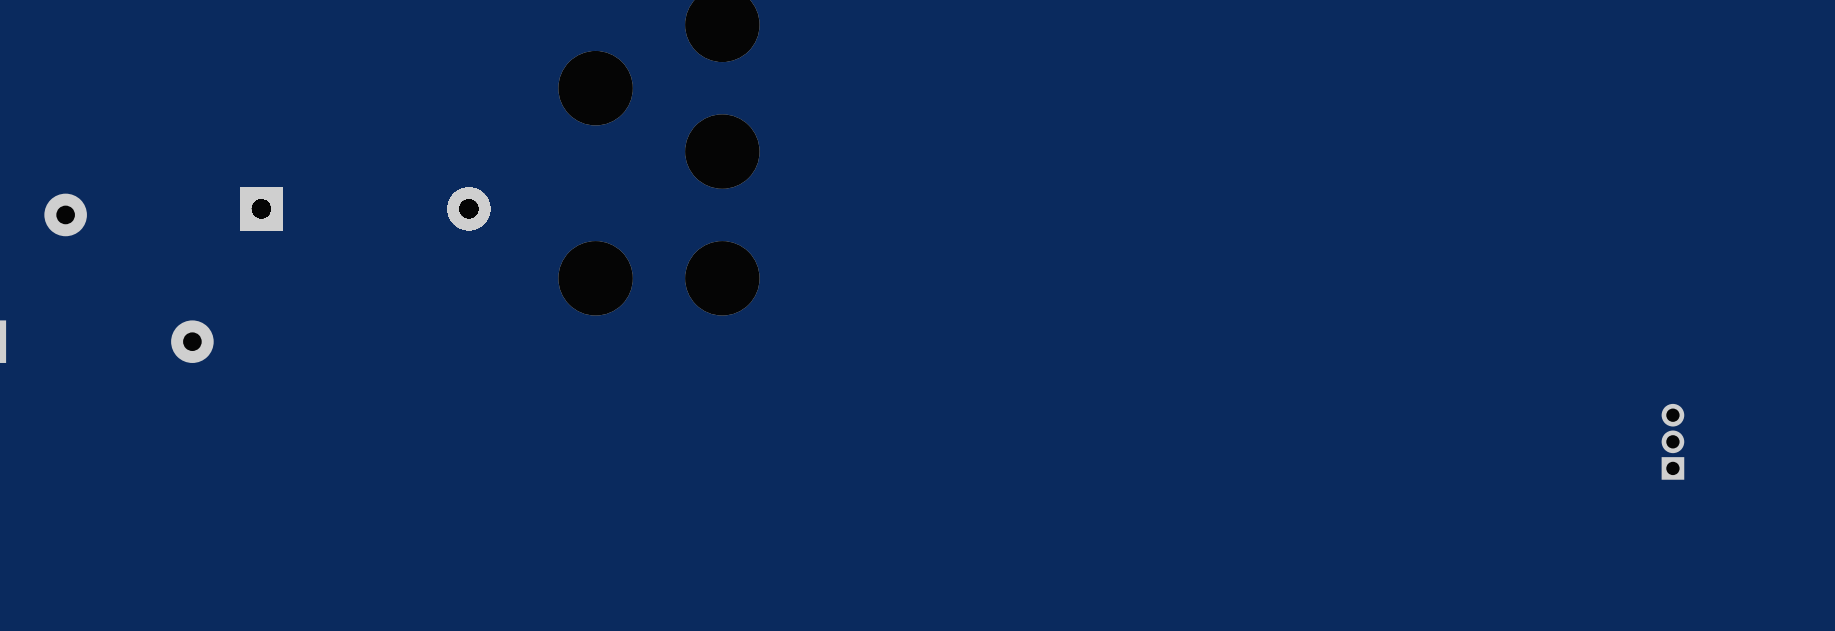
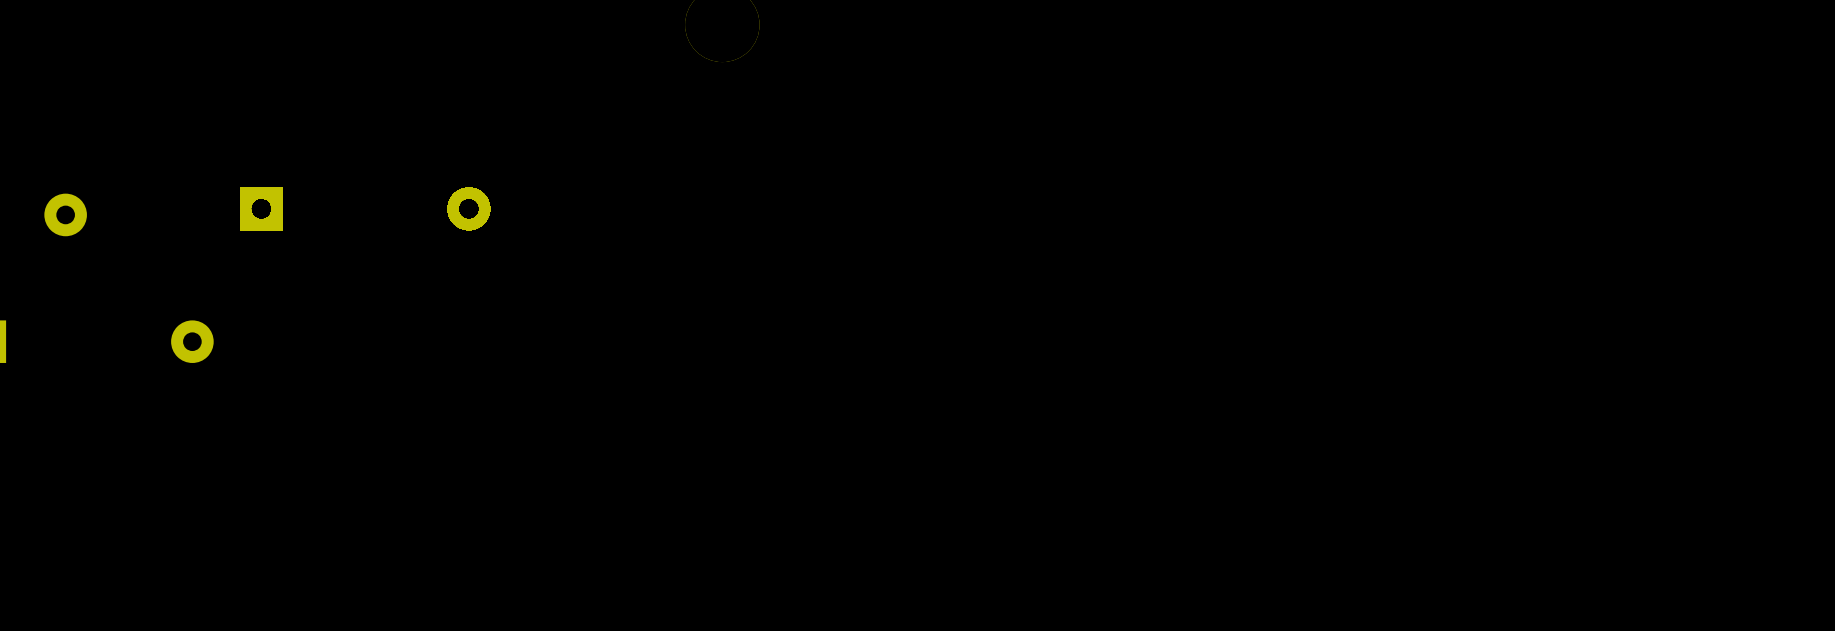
part: (595, 88) -> none
part: (722, 151) -> none
part: (595, 278) -> none
part: (722, 278) -> none
part: (1672, 441) -> none

